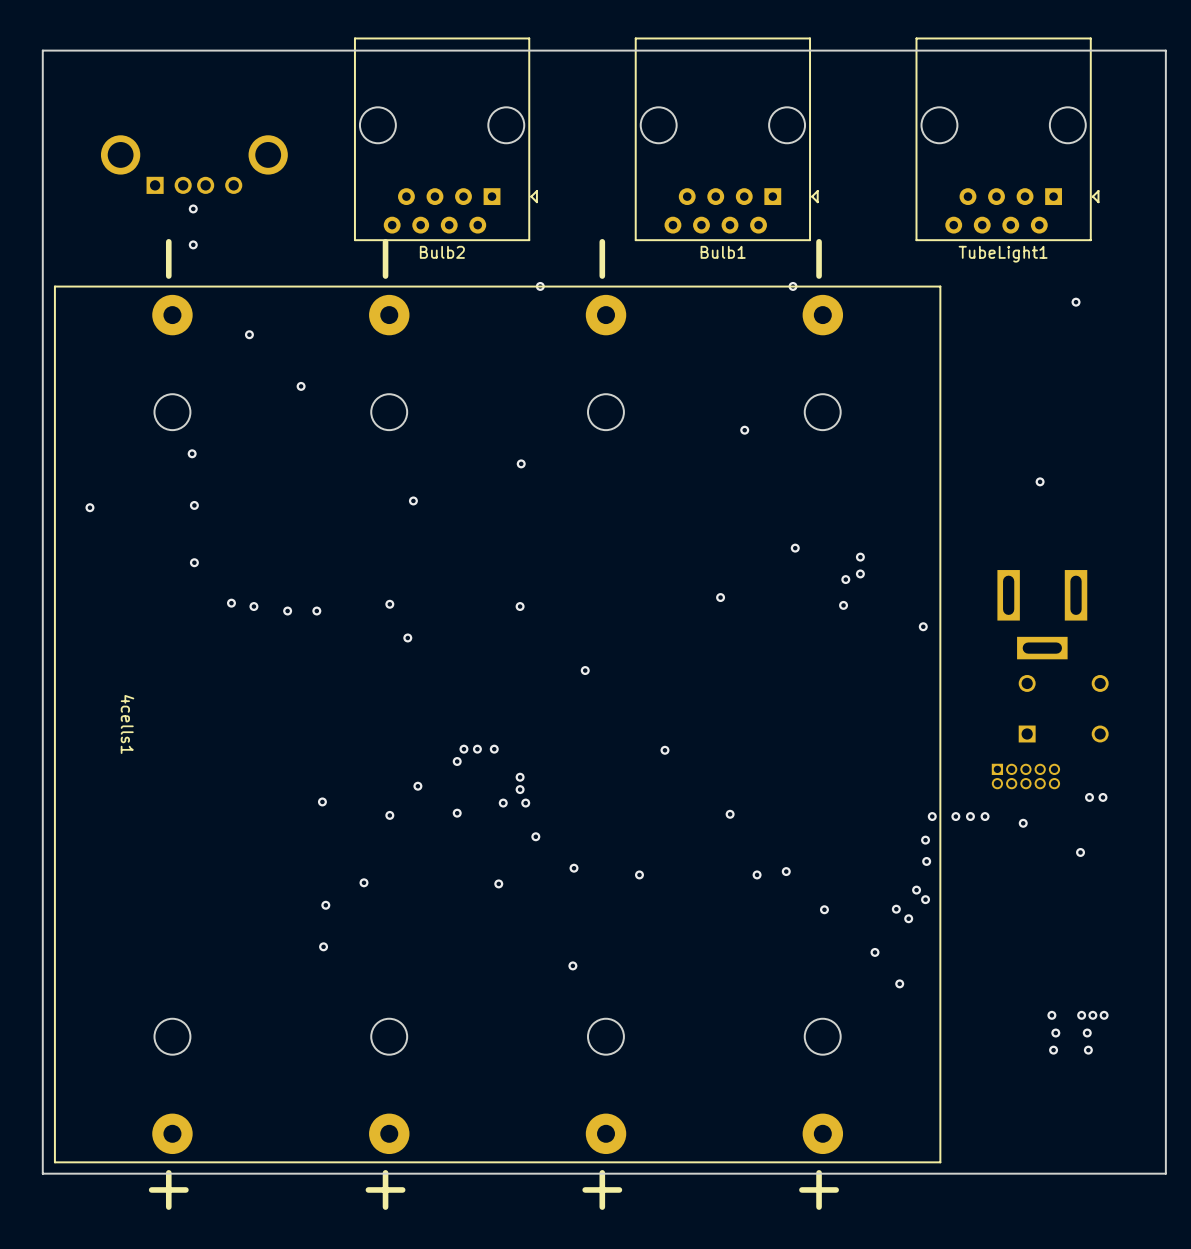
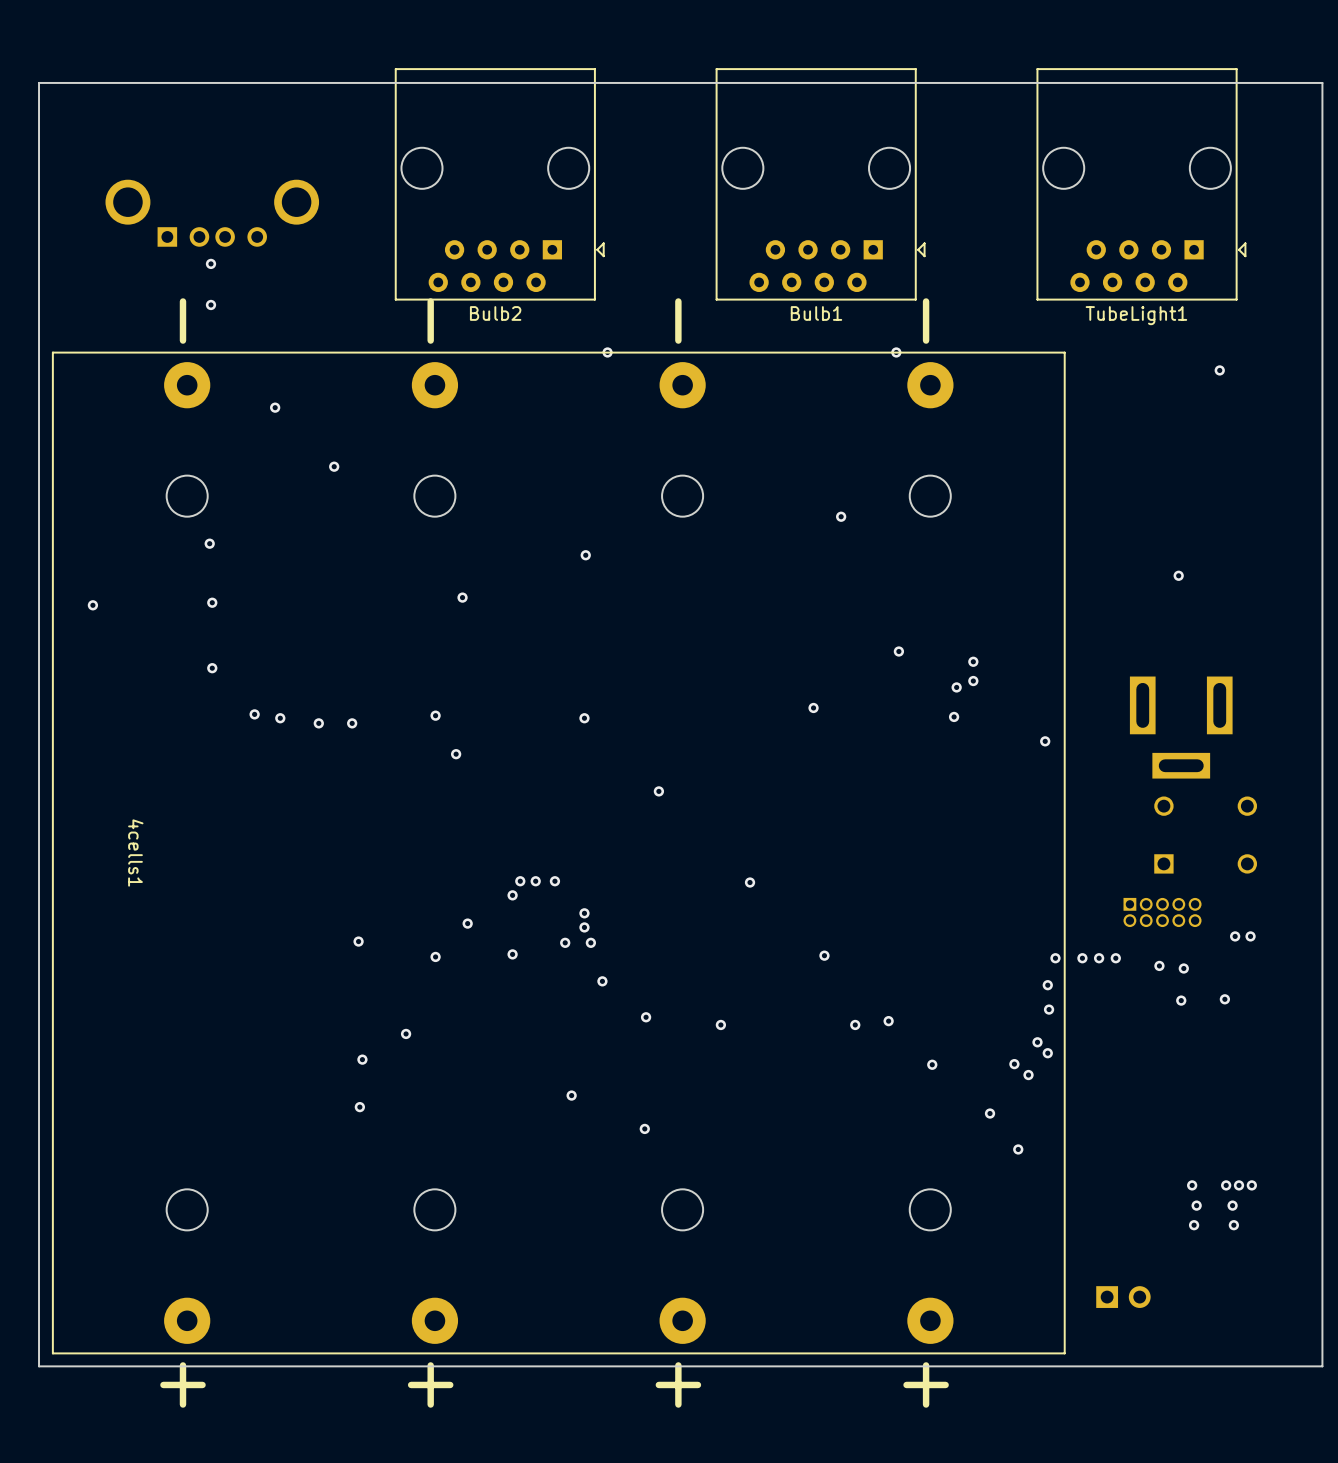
via: none -> (1183, 968)
via: none -> (1181, 1000)
via position: (498, 883) -> (571, 1095)
part: none -> (1123, 1297)

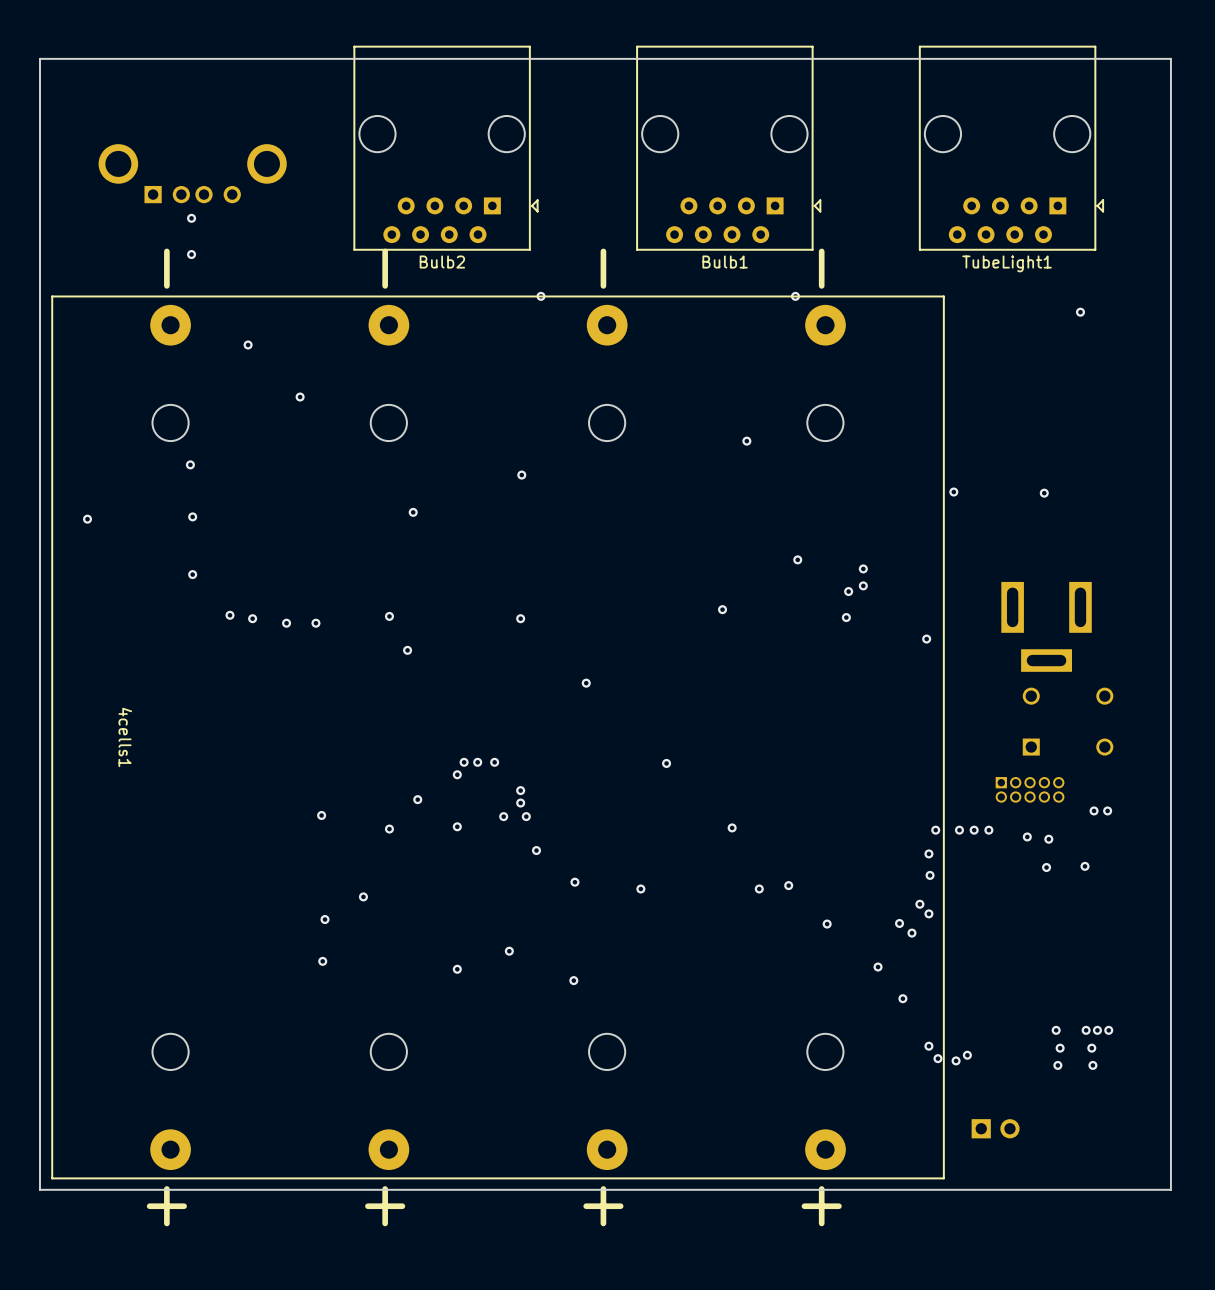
via: none -> (953, 492)
via: none -> (457, 969)
via: none -> (928, 1046)
via: none -> (967, 1055)
via: none -> (937, 1058)
via: none -> (956, 1060)

